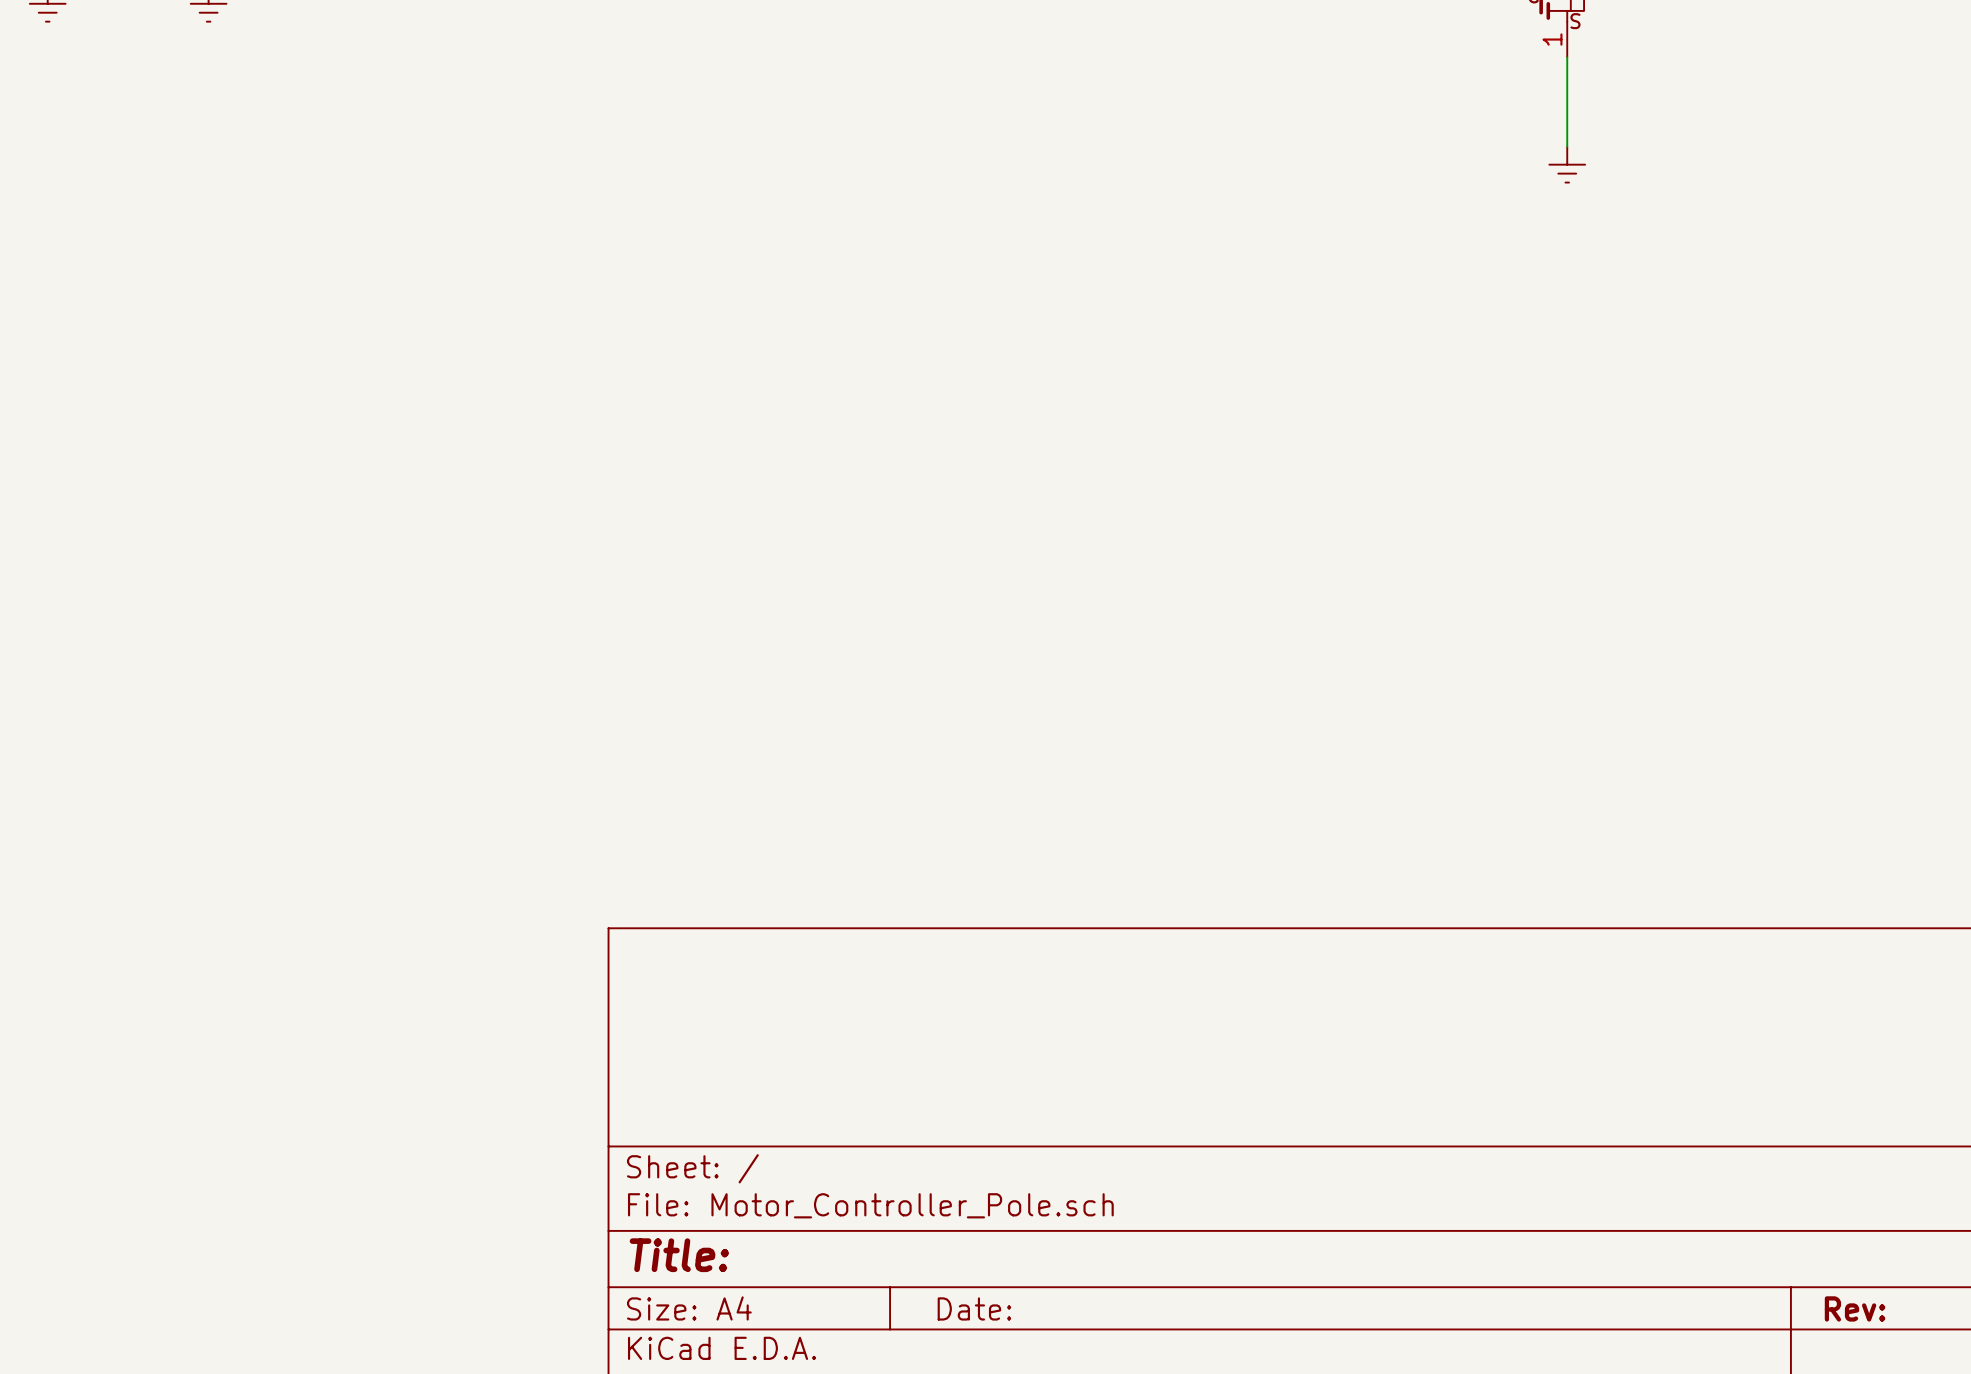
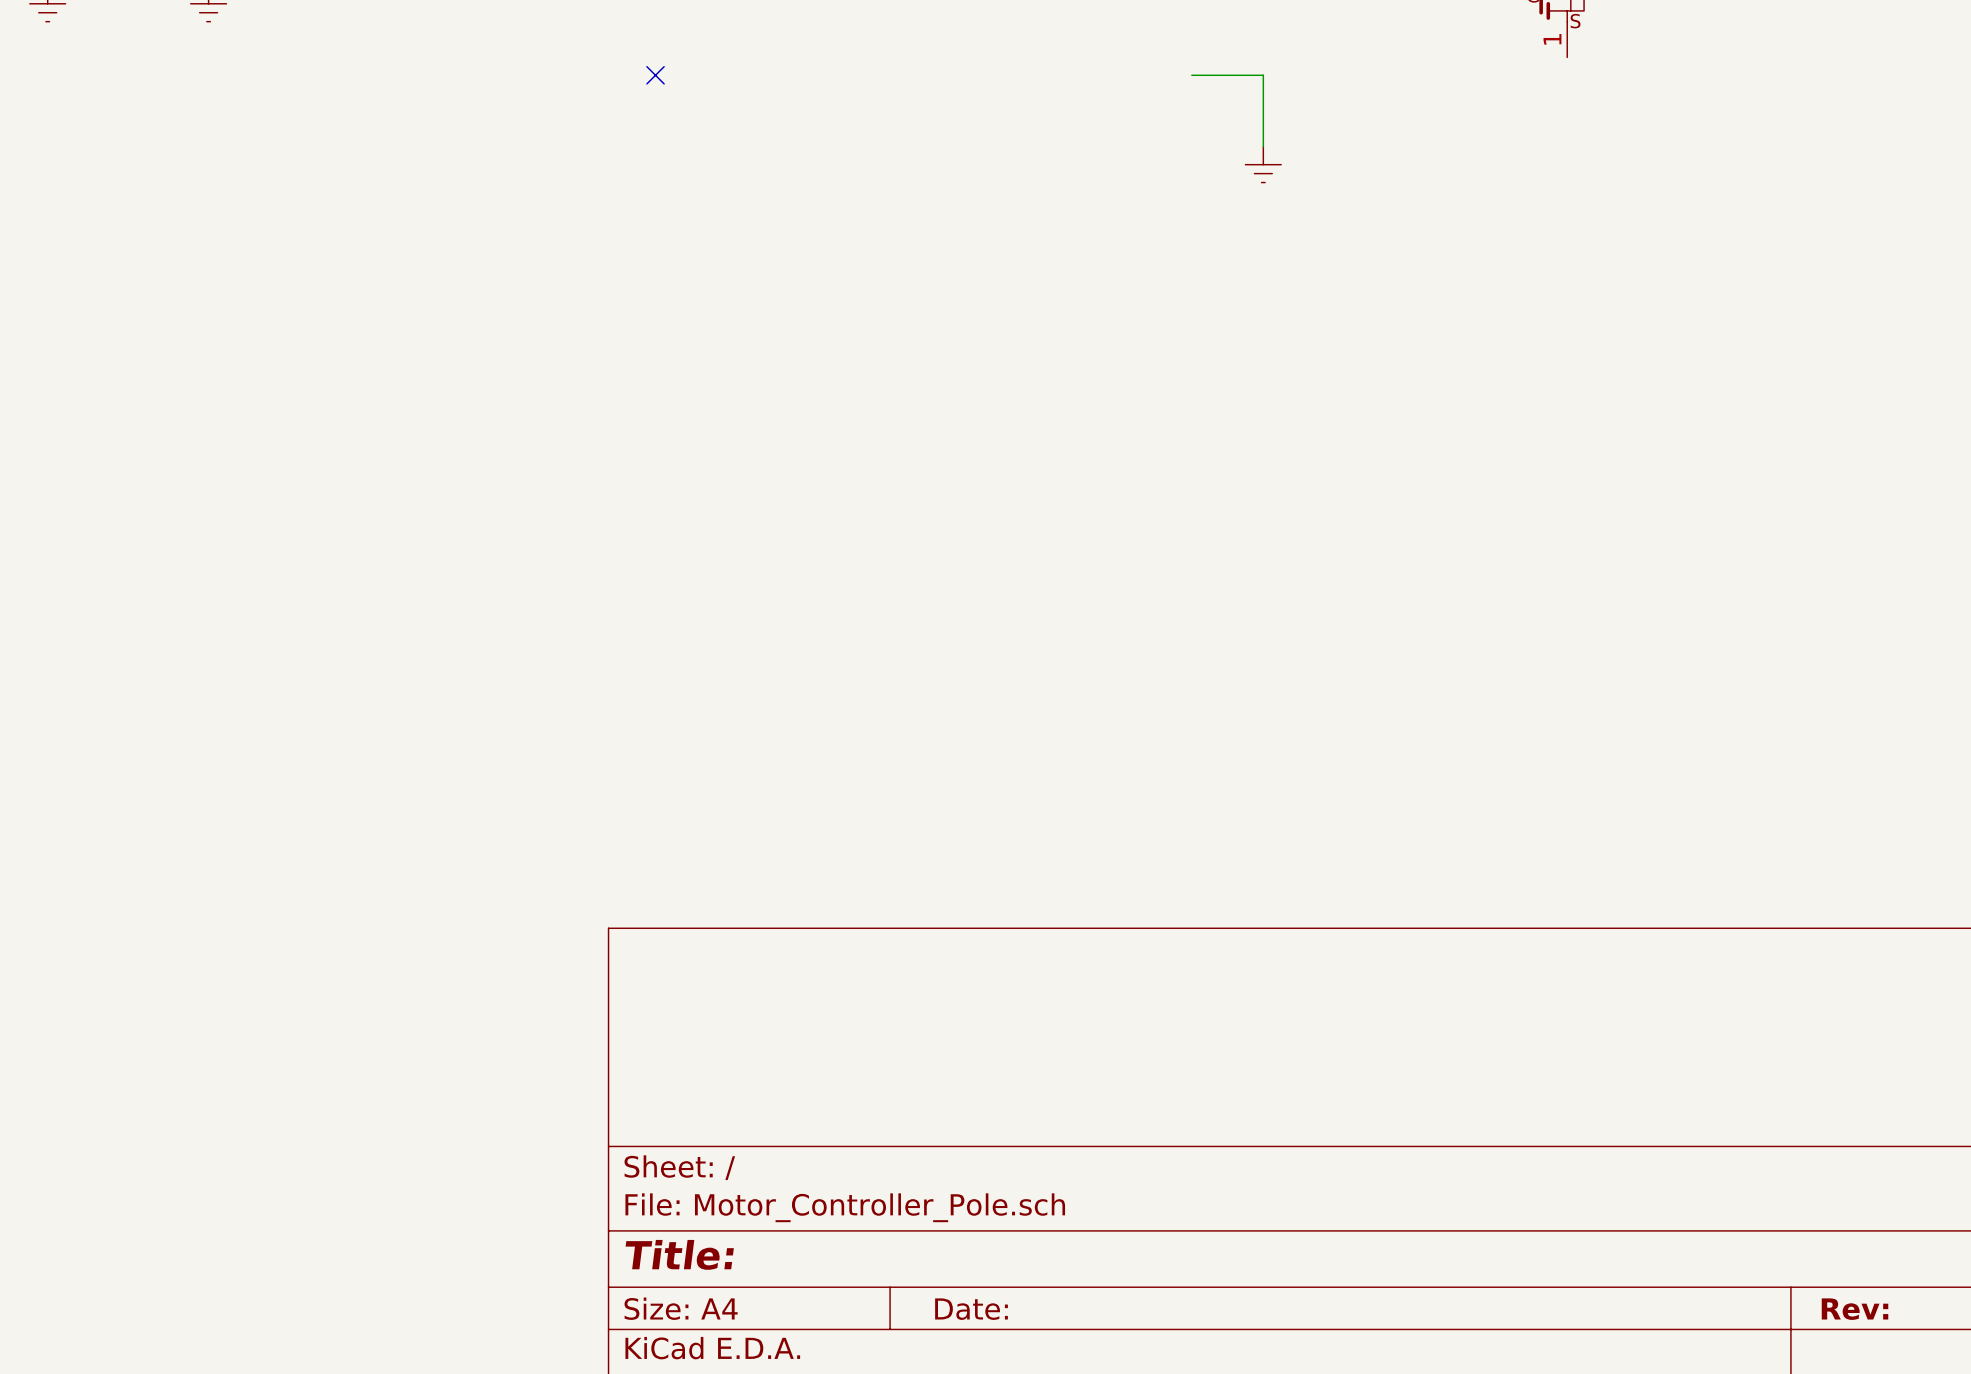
wire: (1567, 57) (1567, 146) -> none
no-connect mark: none -> (655, 75)
wire: none -> (1191, 75) (1263, 75) (1263, 146)
power symbol: none -> (1263, 164)
power symbol: (1567, 164) -> none

